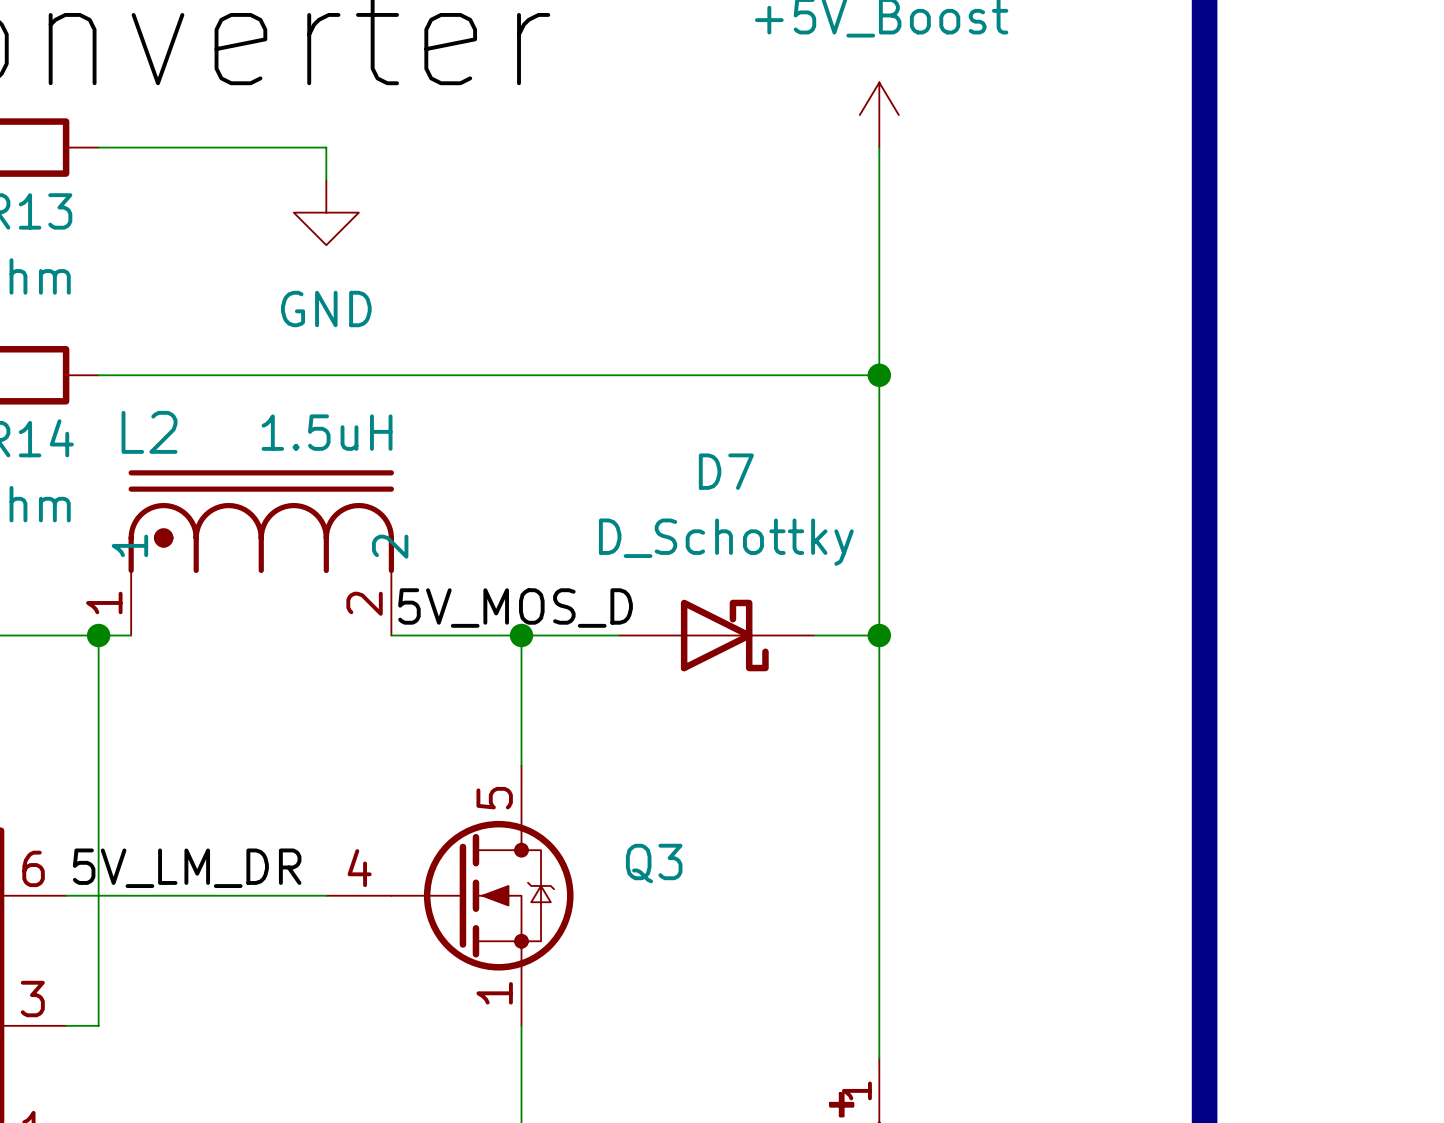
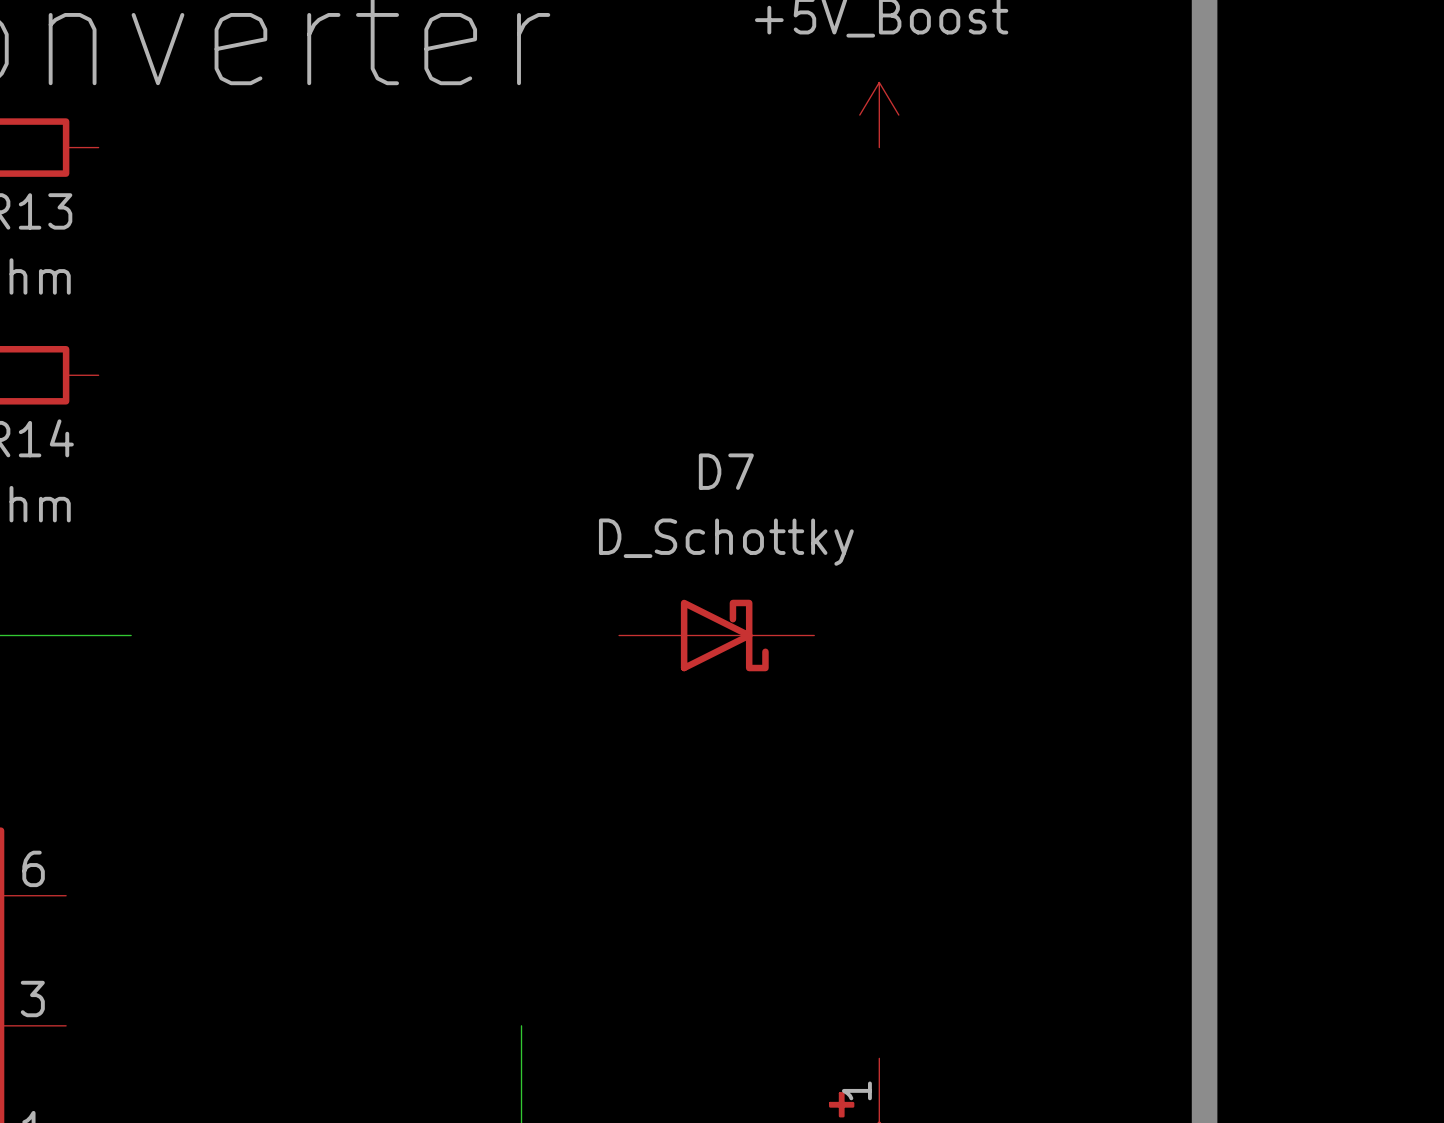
wire: (98, 147) (326, 147) (326, 180) -> none
wire: (879, 147) (879, 1058) -> none
power symbol: GND (326, 212) -> none
wire: (98, 375) (879, 375) -> none
junction: (879, 375) -> none
L2: (261, 552) -> none
label: 5V_MOS_D (515, 608) -> none
wire: (98, 635) (98, 1025) (66, 1025) -> none
junction: (98, 635) -> none
wire: (391, 635) (619, 635) -> none
wire: (521, 635) (521, 765) -> none
junction: (521, 635) -> none
wire: (814, 635) (879, 635) -> none
junction: (879, 635) -> none
label: 5V_LM_DR (187, 868) -> none
wire: (66, 895) (326, 895) -> none
Q3: (449, 895) -> none

